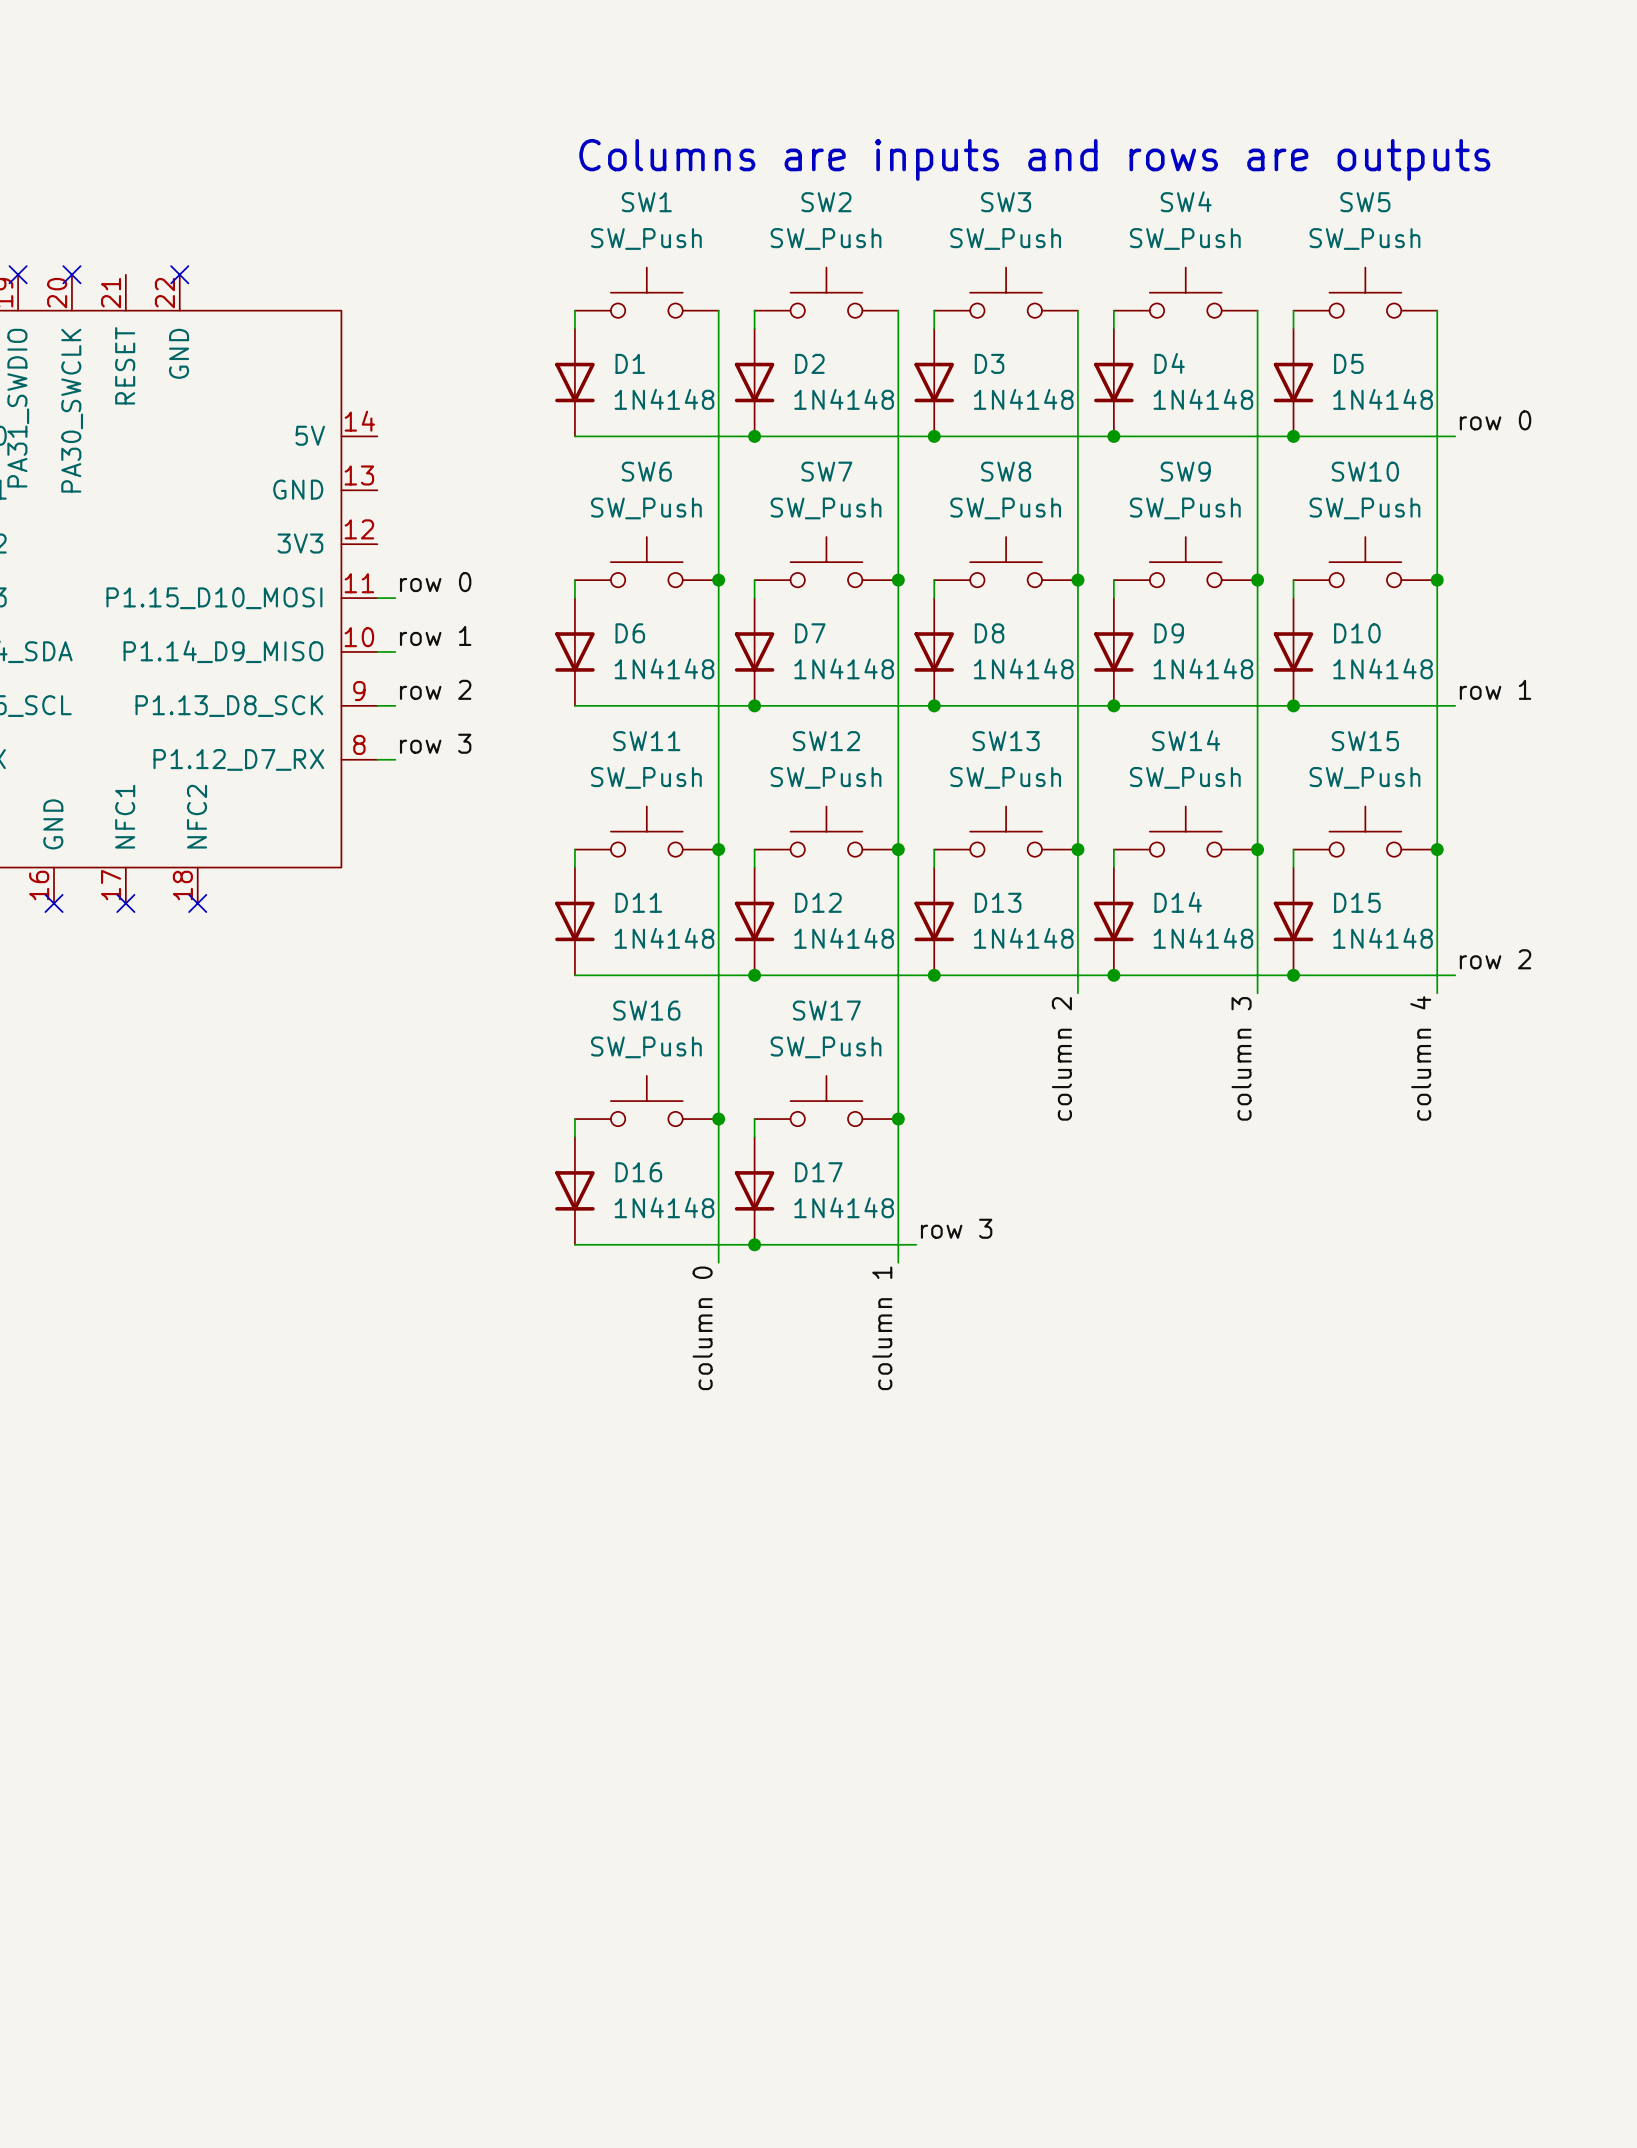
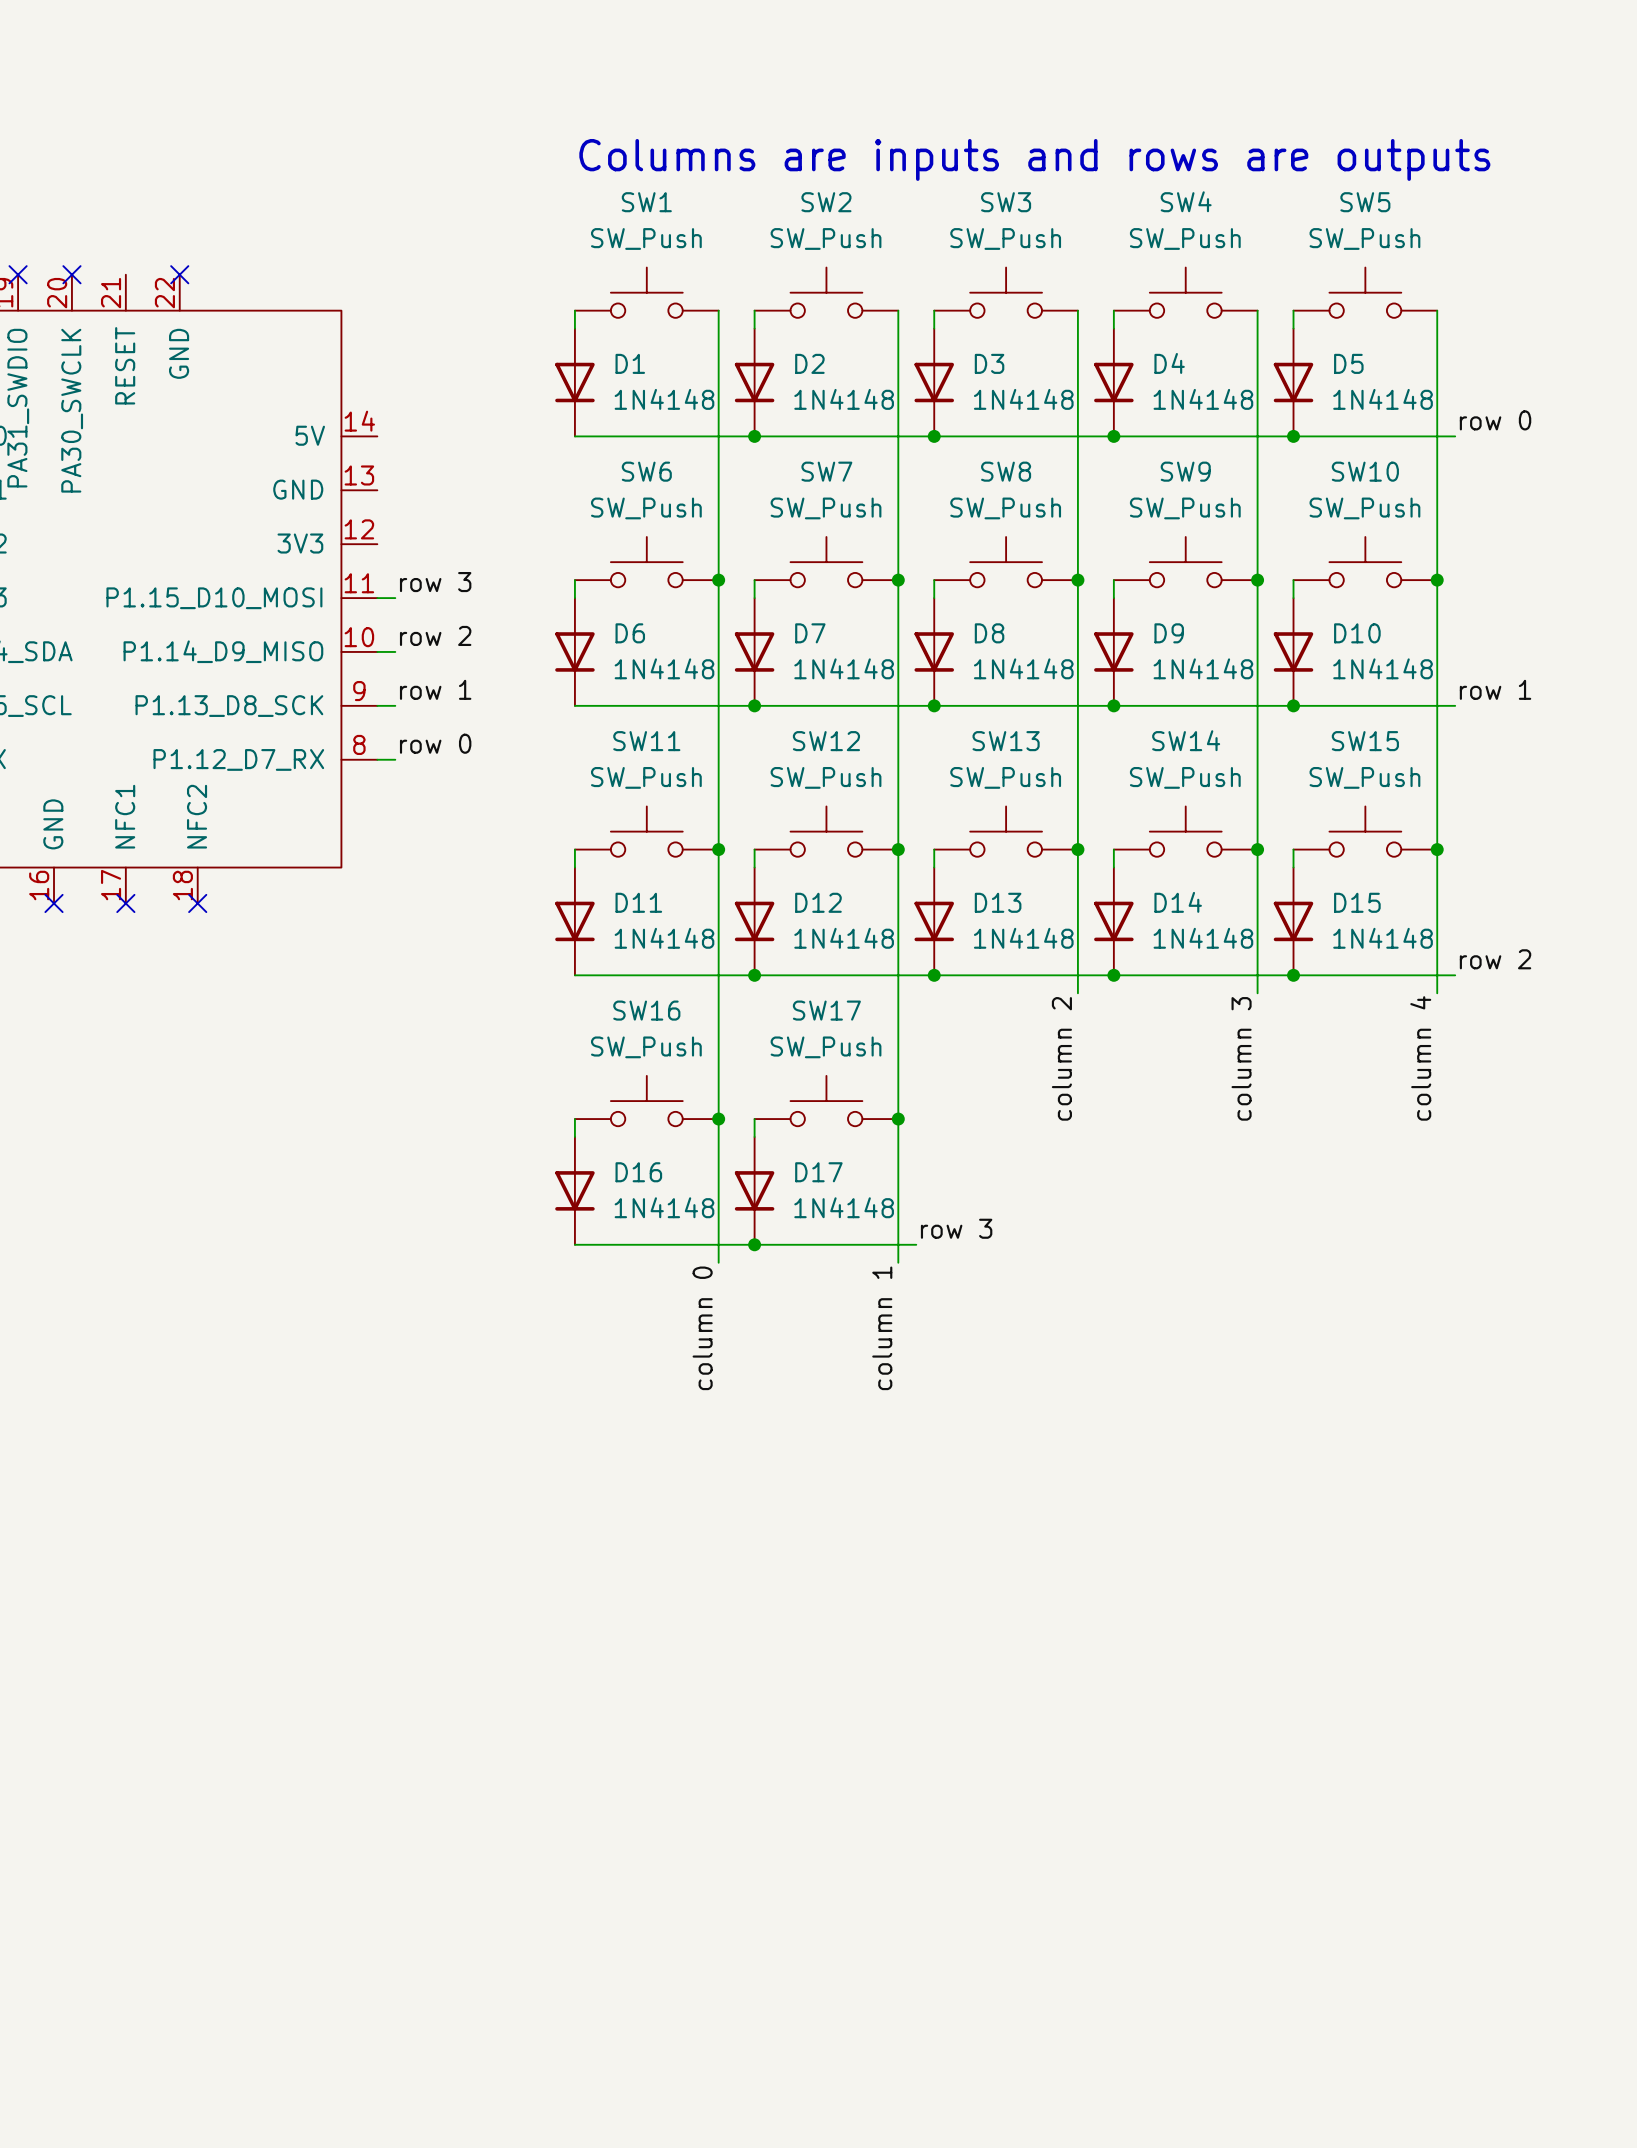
label: row 0 (435, 582) -> row 3 (435, 582)
label: row 1 (435, 635) -> row 2 (435, 635)
label: row 2 (435, 689) -> row 1 (435, 689)
label: row 3 (435, 743) -> row 0 (435, 743)

